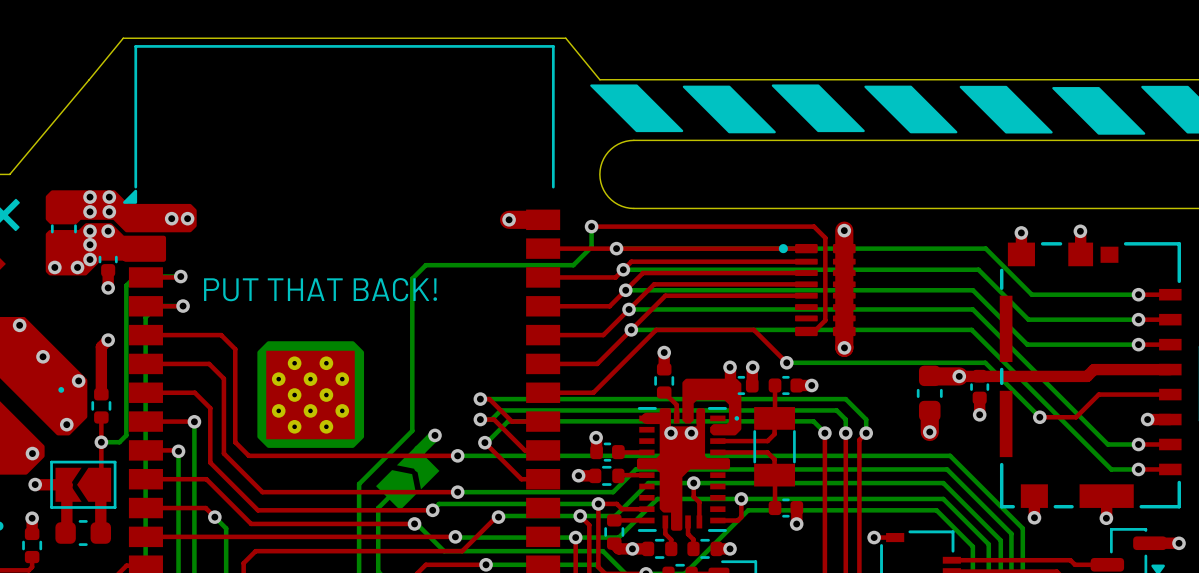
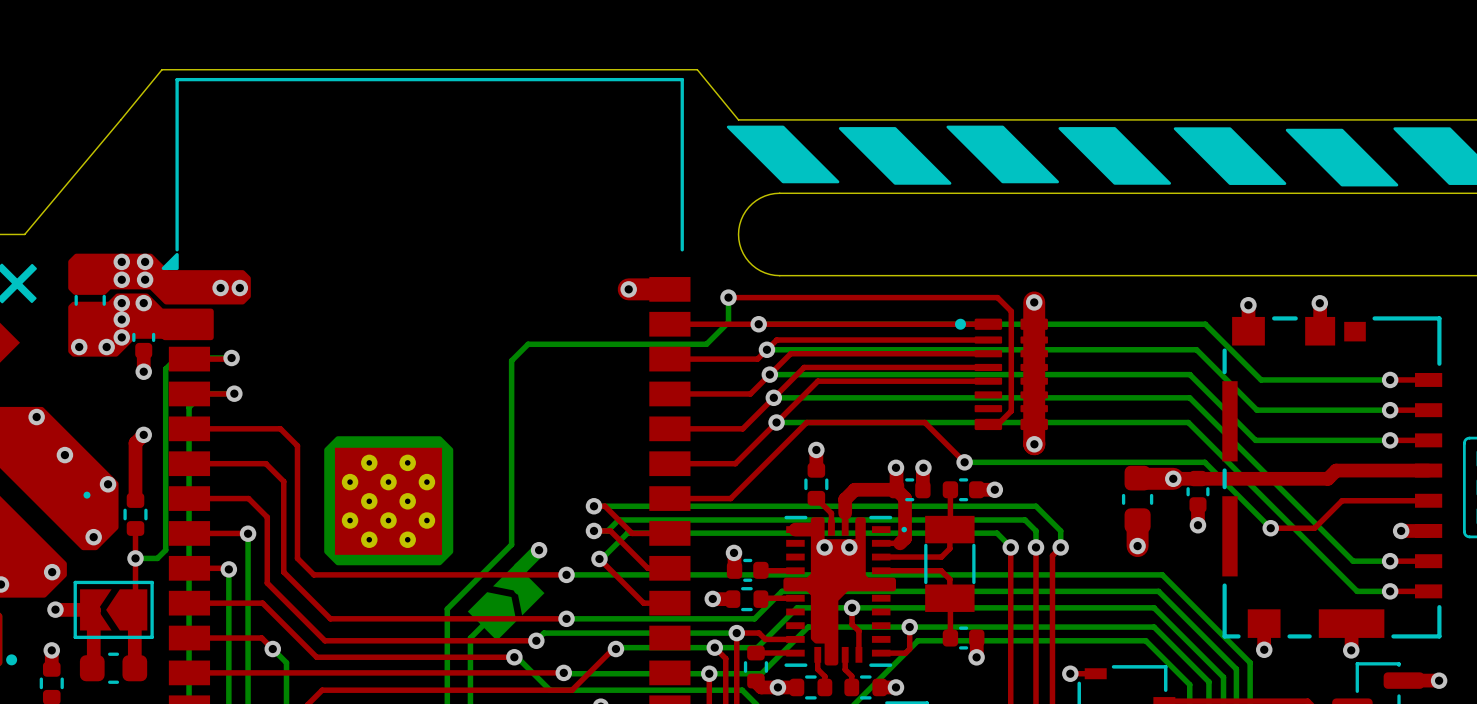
text: PUT THAT BACK! (320, 289) -> none
drawing: [682, 378, 742, 436] -> none
top track: none -> (845, 527) (845, 499) (854, 489) (896, 489) (905, 498) (905, 538) (900, 543) (881, 543)

